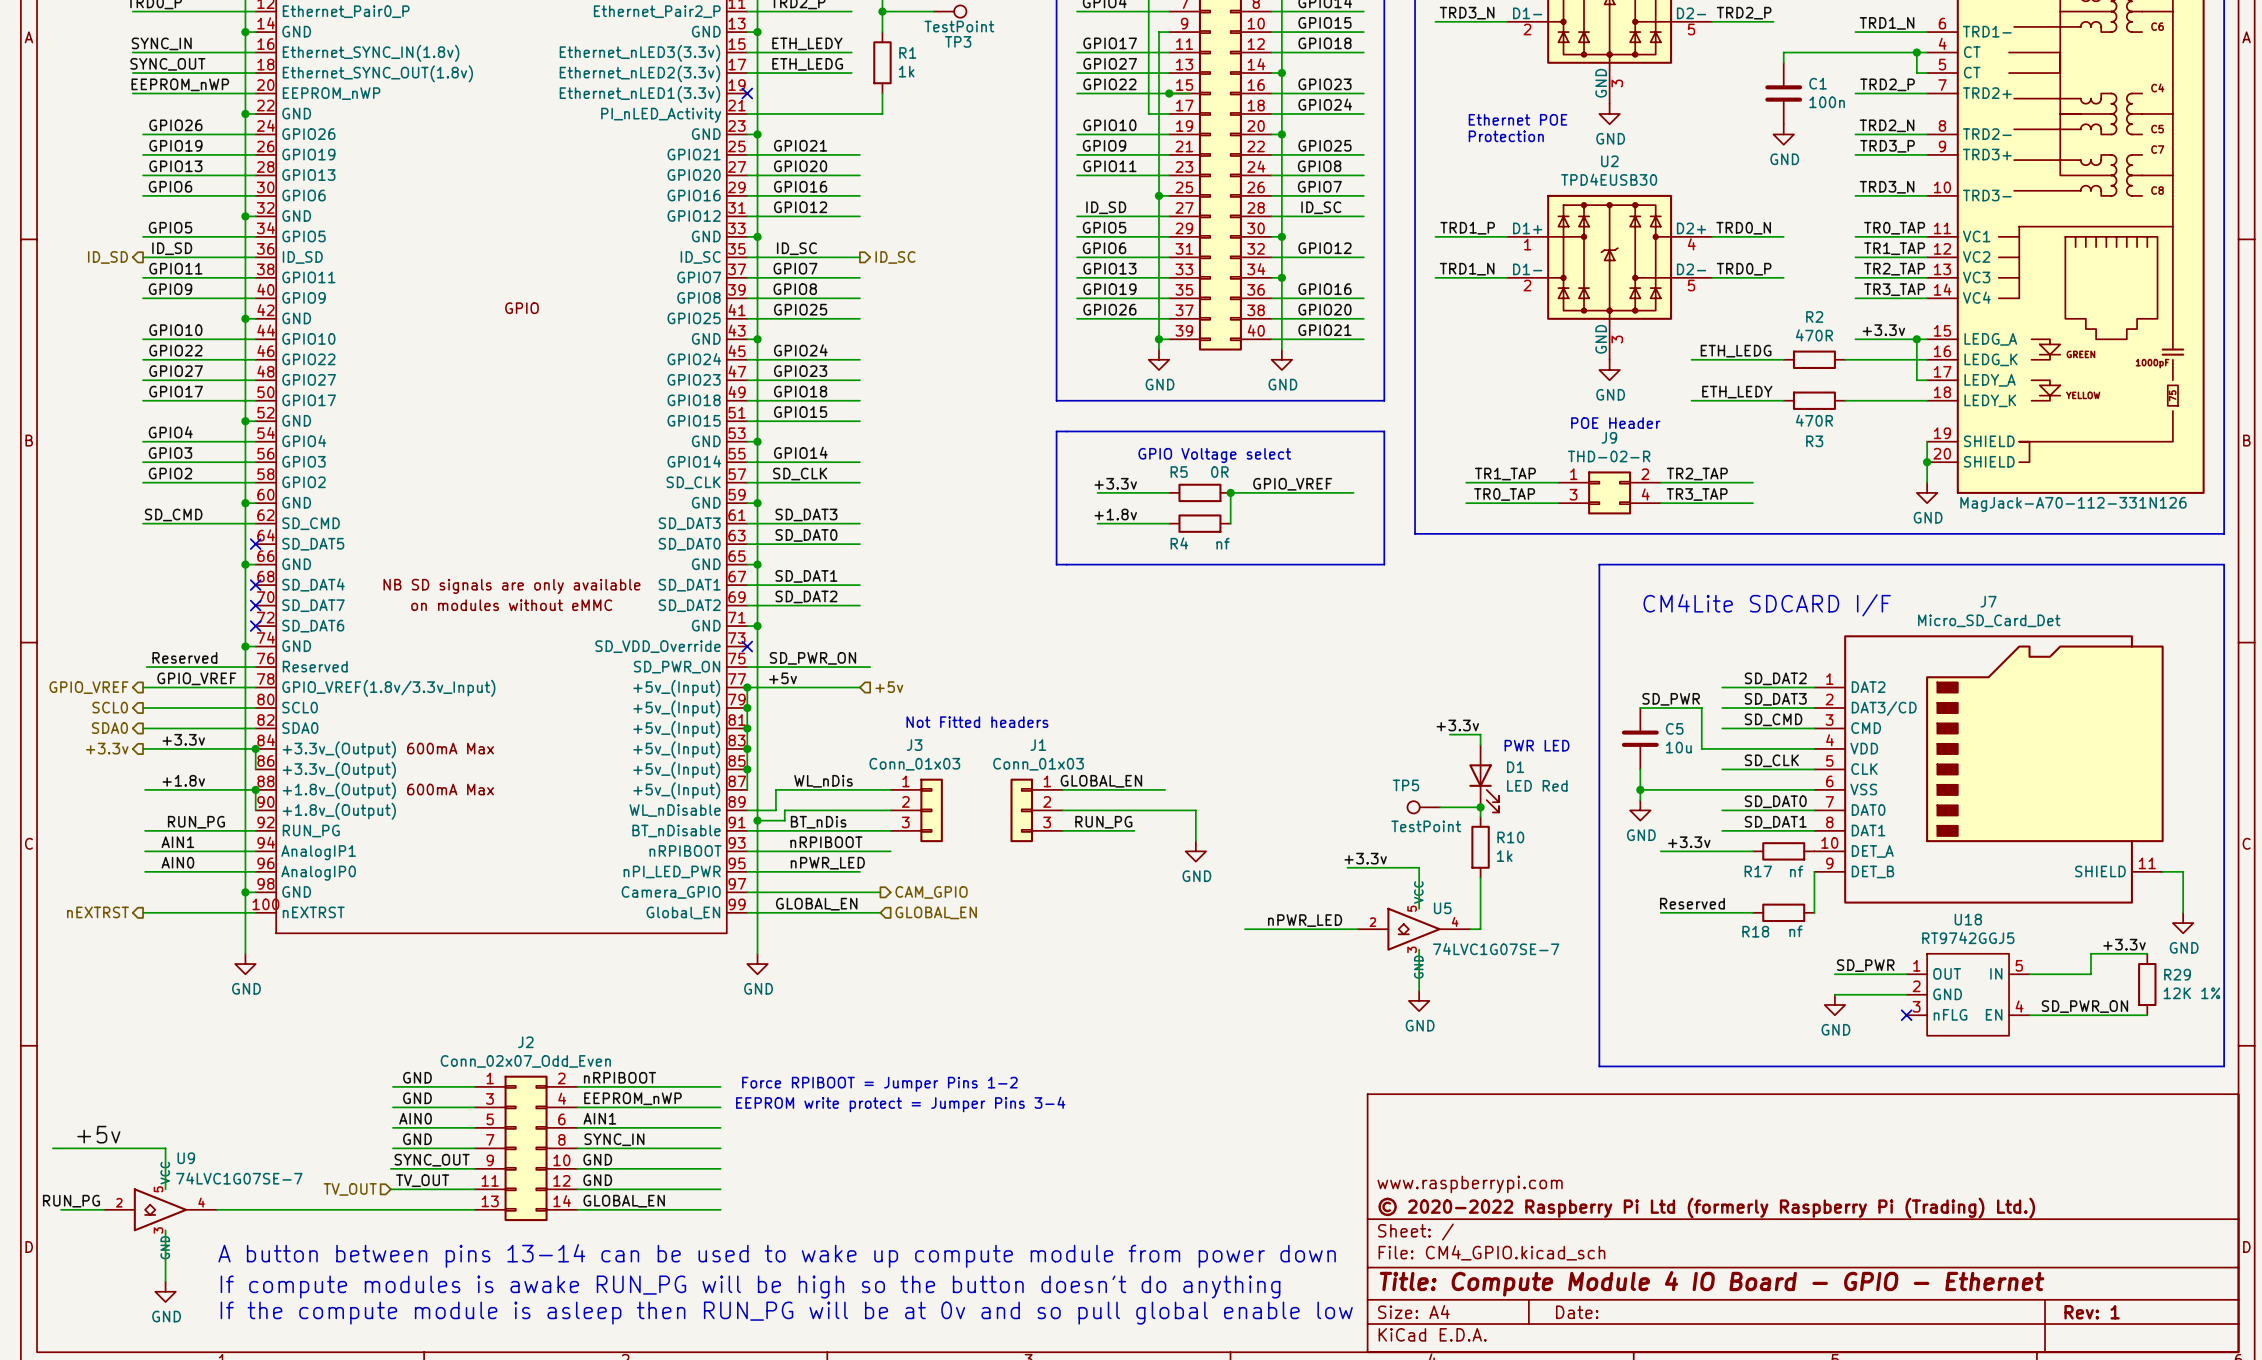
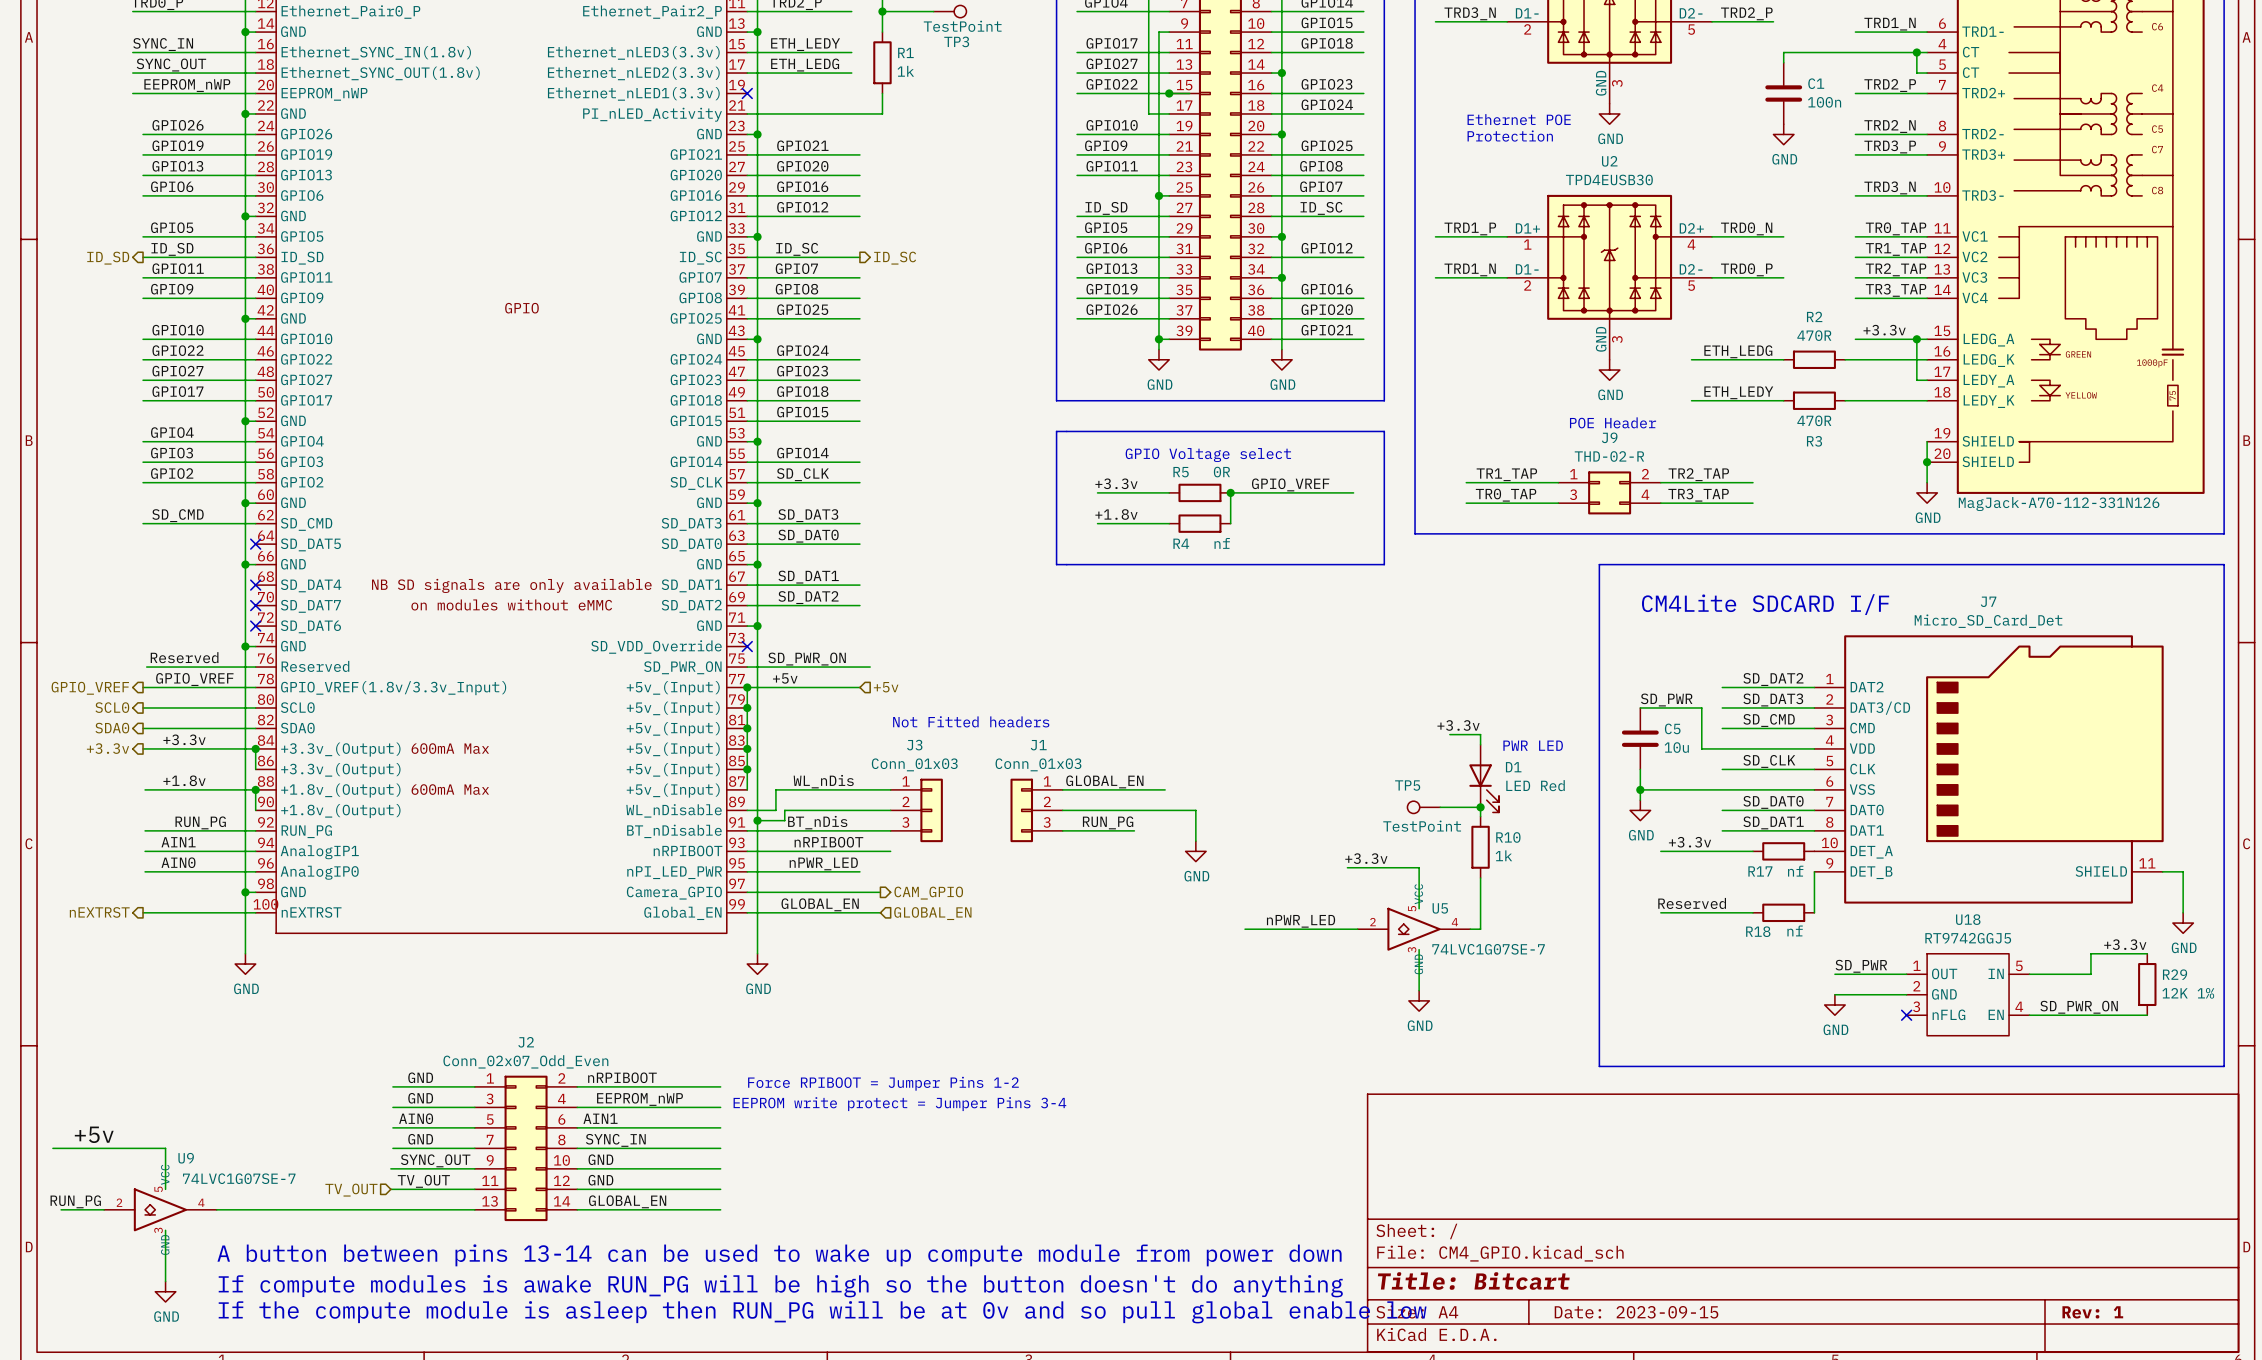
title block: www.raspberrypi.com (1470, 1184) -> none
title block: © 2020-2022 Raspberry Pi Ltd (formerly Raspberry Pi (Trading) Ltd.) (1706, 1208) -> none
title block: Title: Compute Module 4 IO Board - GPIO - Ethernet (1712, 1283) -> Title: Bitcart (1473, 1281)
title block: Date: (1577, 1312) -> Date: 2023-09-15 (1636, 1312)

